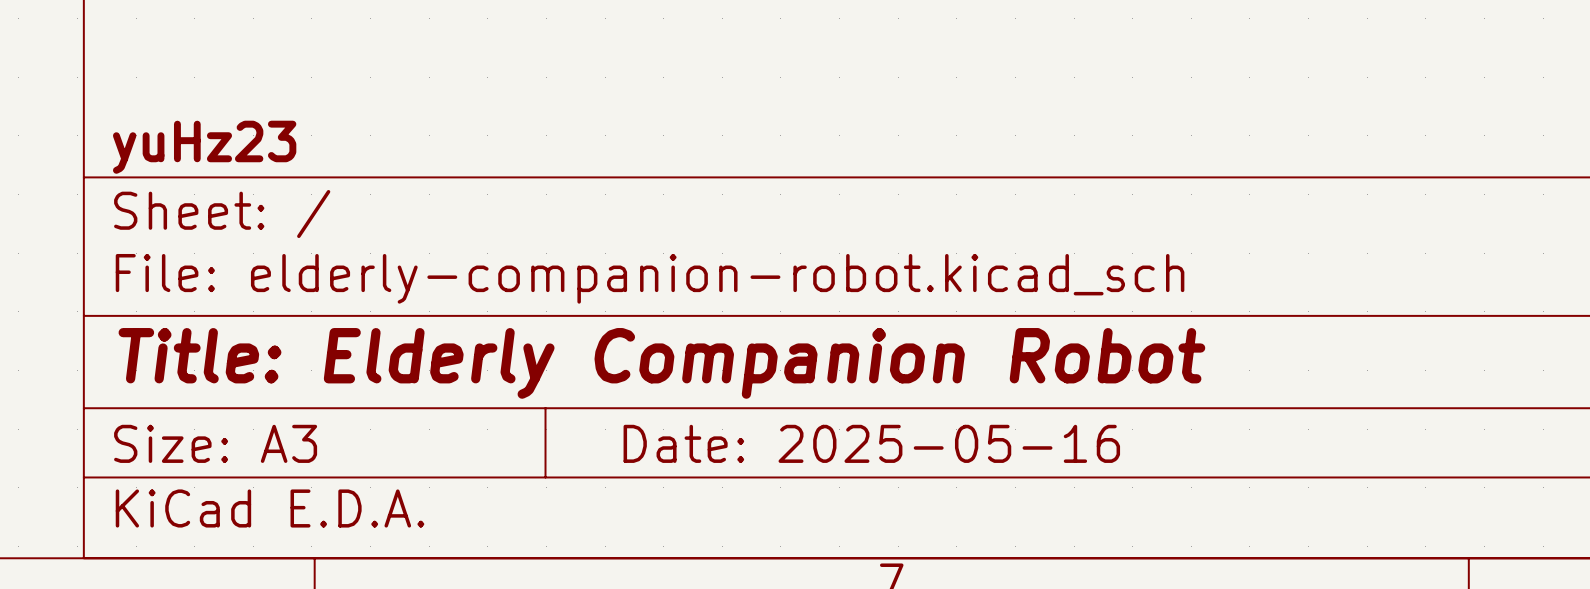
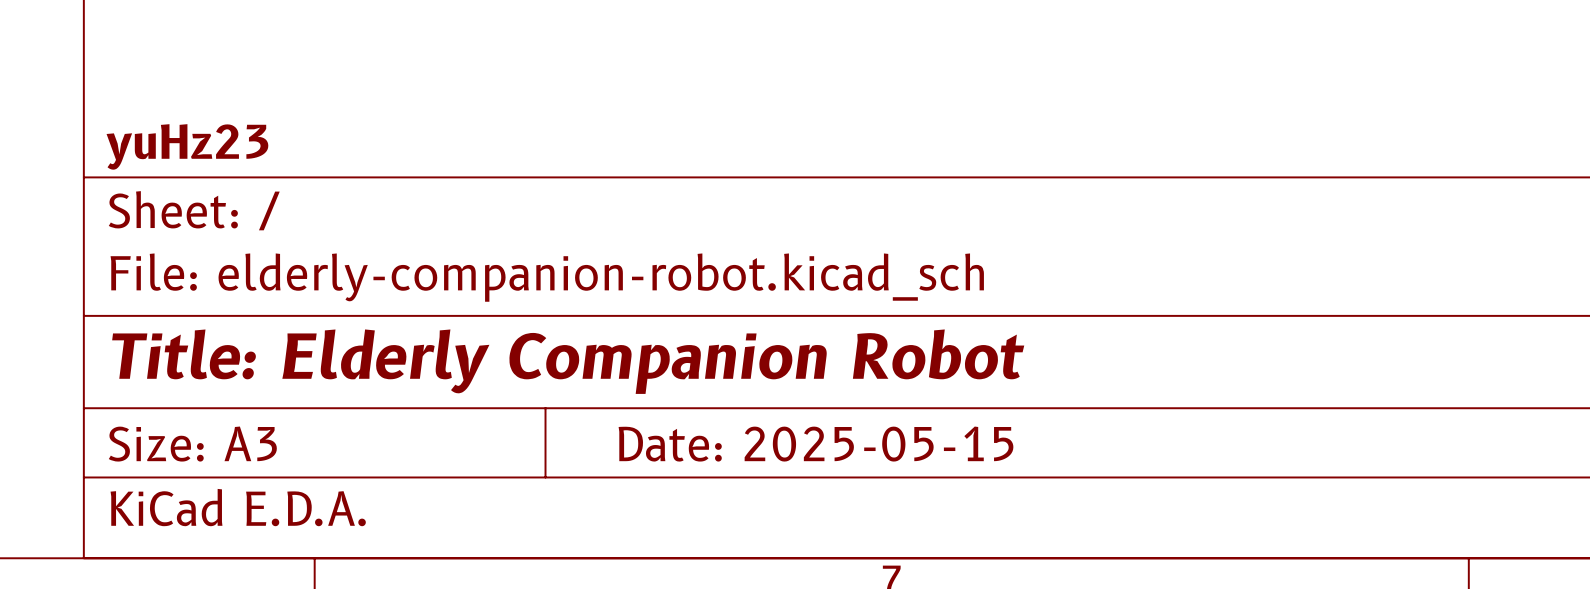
title block: Date: 2025-05-16 (871, 443) -> Date: 2025-05-15 (816, 444)

